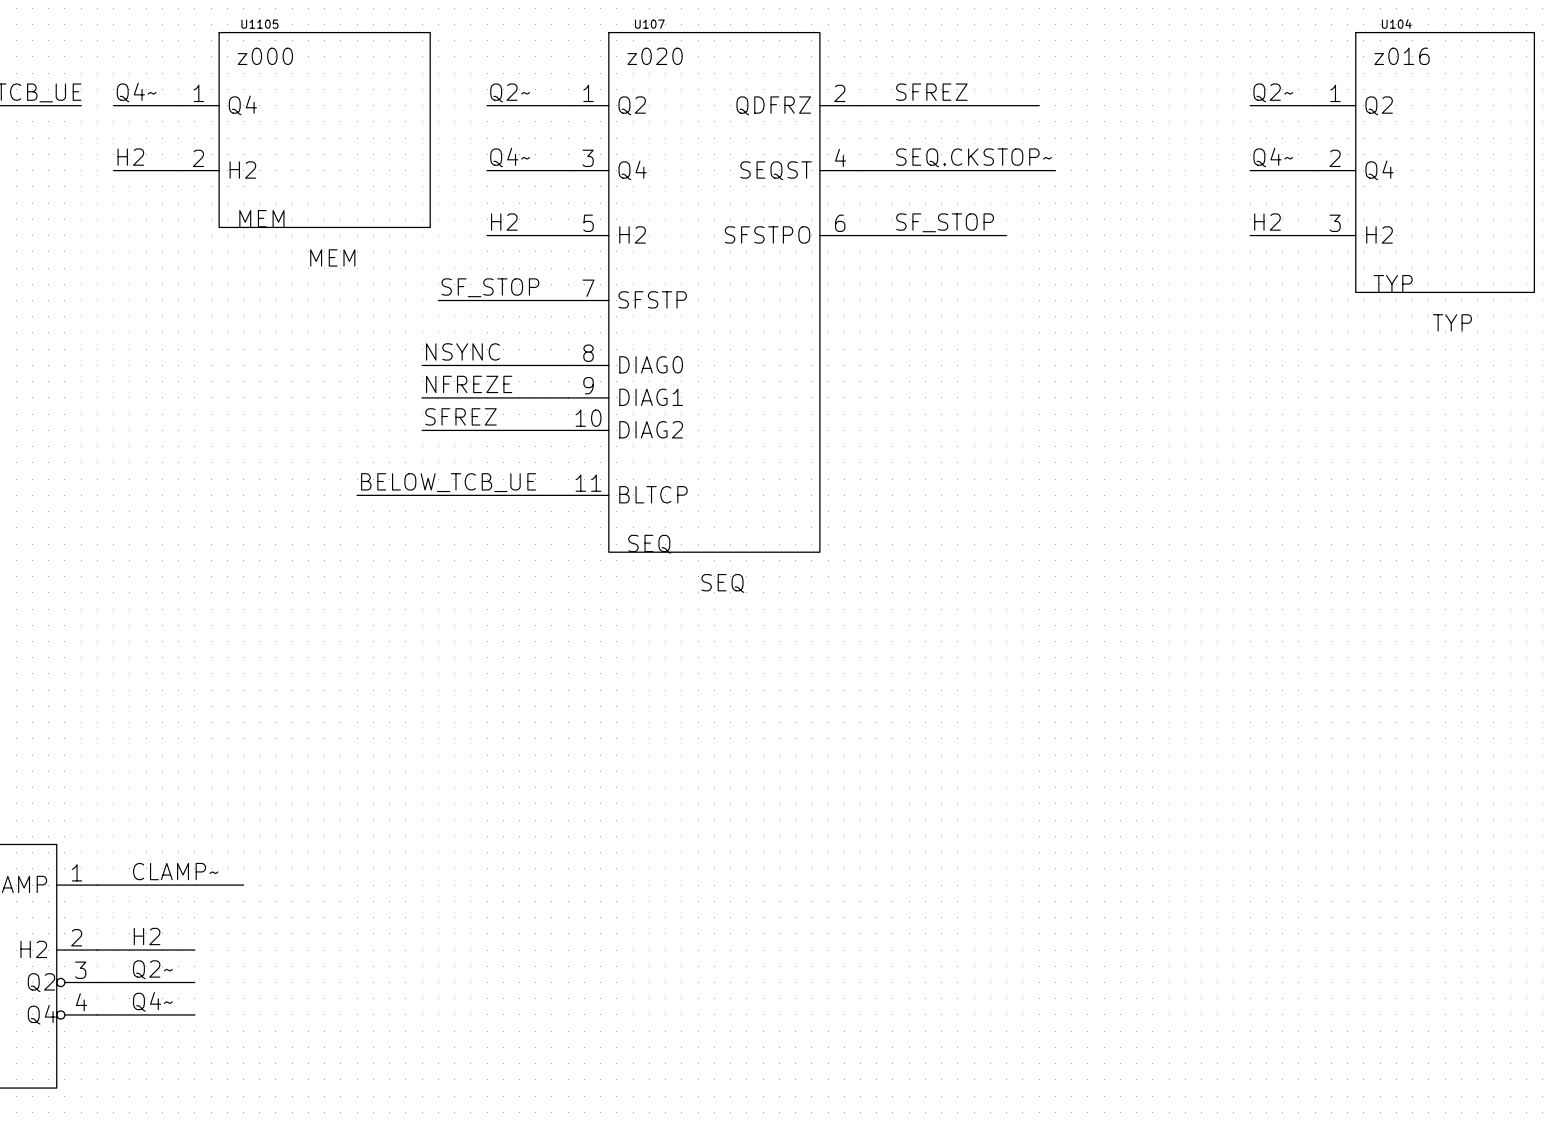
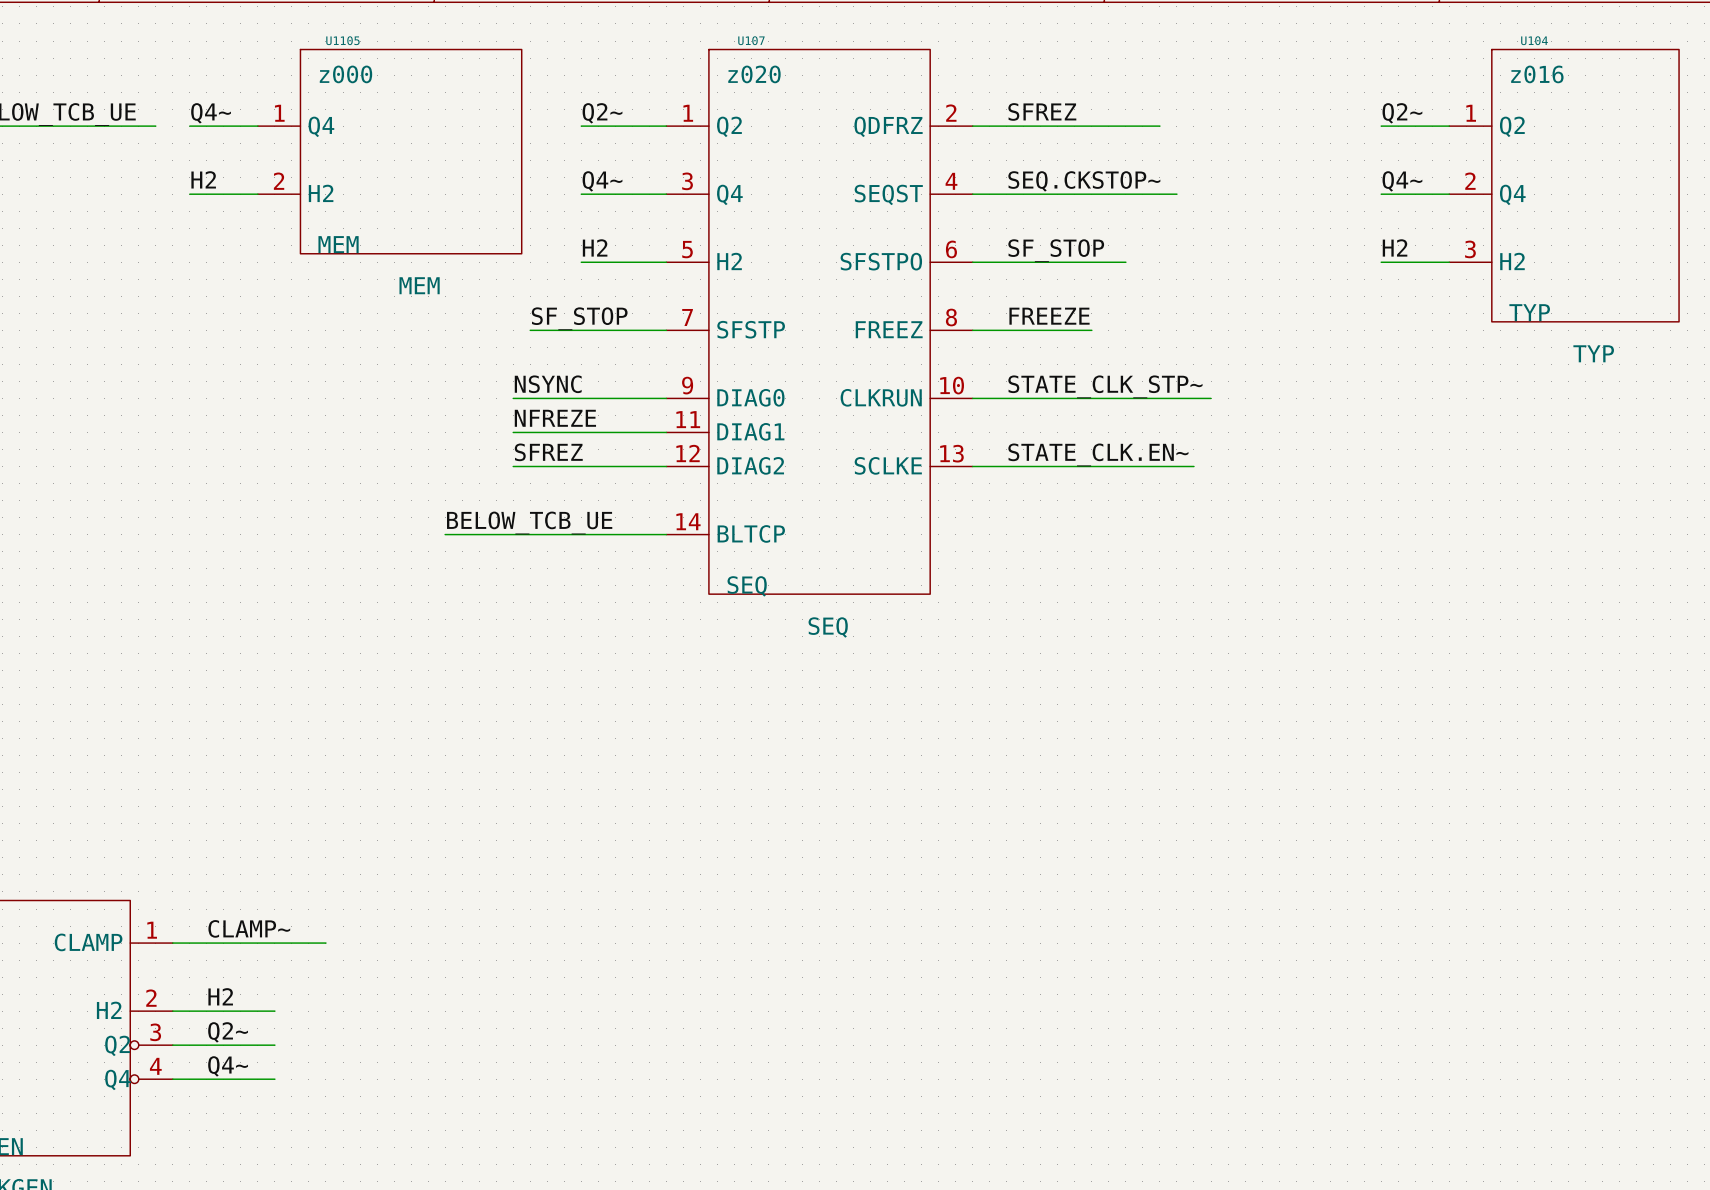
U107 symbol: [568, 32, 861, 553] -> [666, 49, 973, 595]
label: none -> FREEZE (1049, 316)
wire: none -> (972, 330) (1091, 330)
label: none -> STATE_CLK_STP~ (1105, 386)
wire: none -> (972, 398) (1211, 398)
label: none -> STATE_CLK.EN~ (1098, 454)
wire: none -> (972, 466) (1193, 466)

